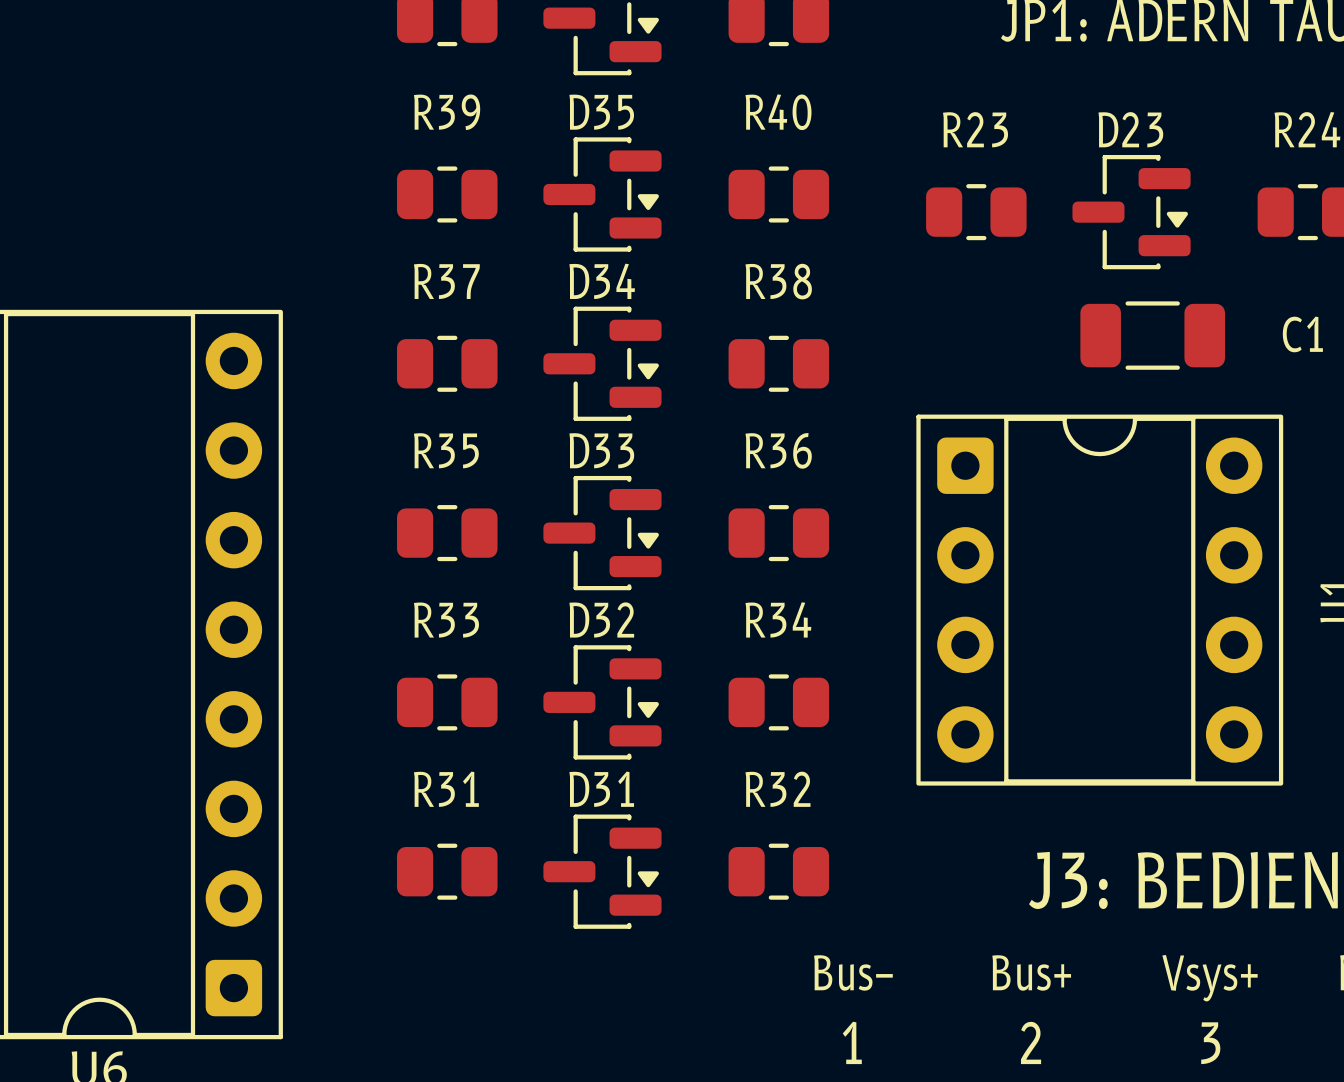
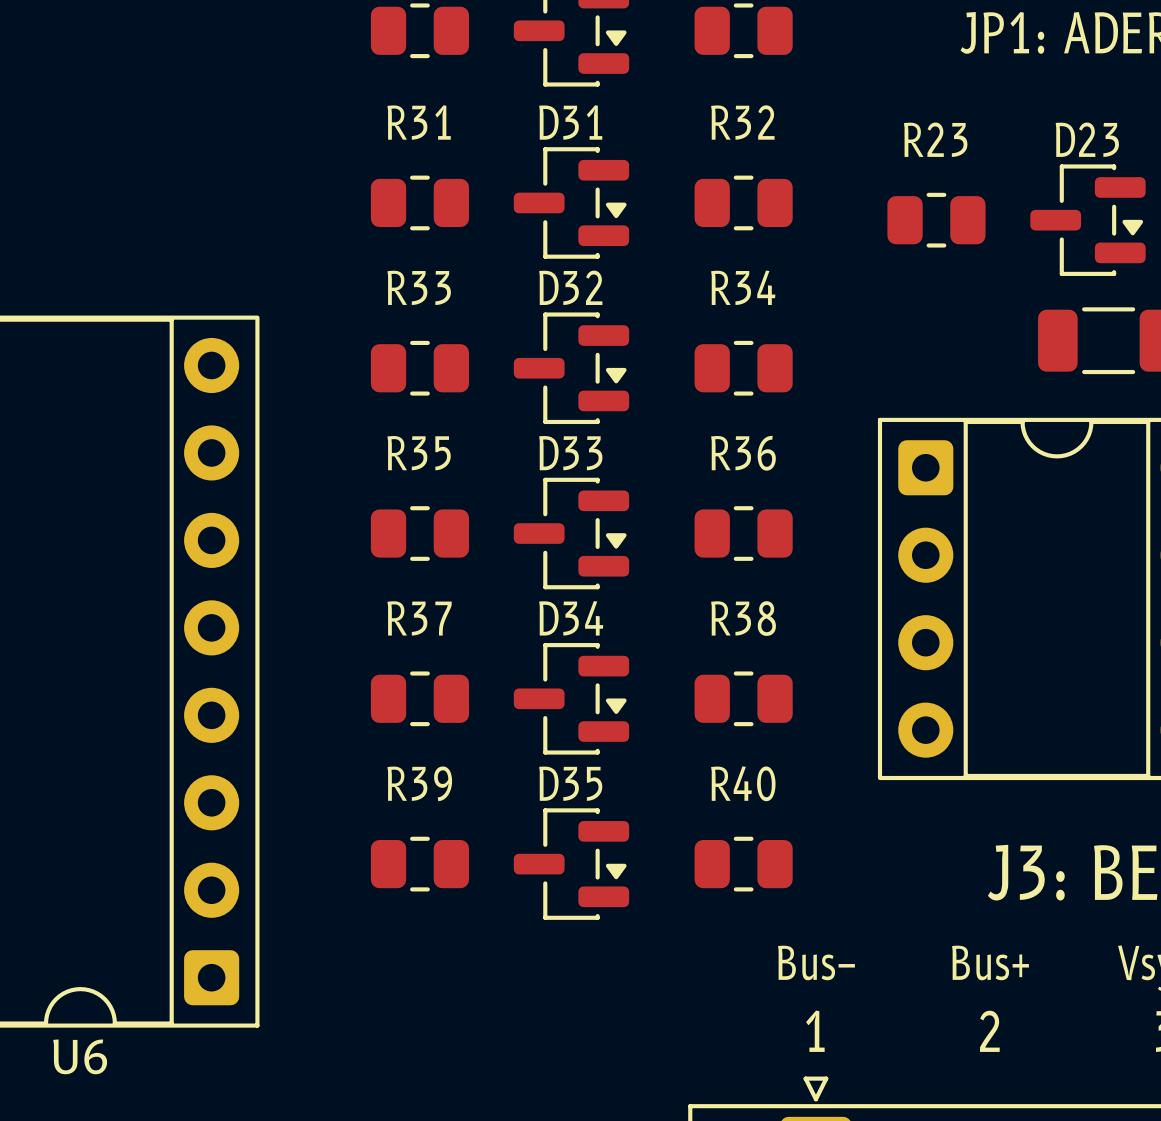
R39 name: R39 (447, 112) -> R31 (419, 122)
D35 name: D35 (601, 112) -> D31 (570, 122)
R40 name: R40 (778, 112) -> R32 (742, 122)
R37 name: R37 (446, 281) -> R33 (419, 287)
D34 name: D34 (602, 281) -> D32 (570, 287)
R38 name: R38 (778, 281) -> R34 (743, 287)
D32 name: D32 (601, 619) -> D34 (571, 618)
R34 name: R34 (778, 619) -> R38 (743, 618)
R33 name: R33 (446, 620) -> R37 (419, 618)
R31 name: R31 (446, 789) -> R39 (419, 783)
D31 name: D31 (601, 789) -> D35 (570, 783)
R32 name: R32 (778, 789) -> R40 (743, 783)

